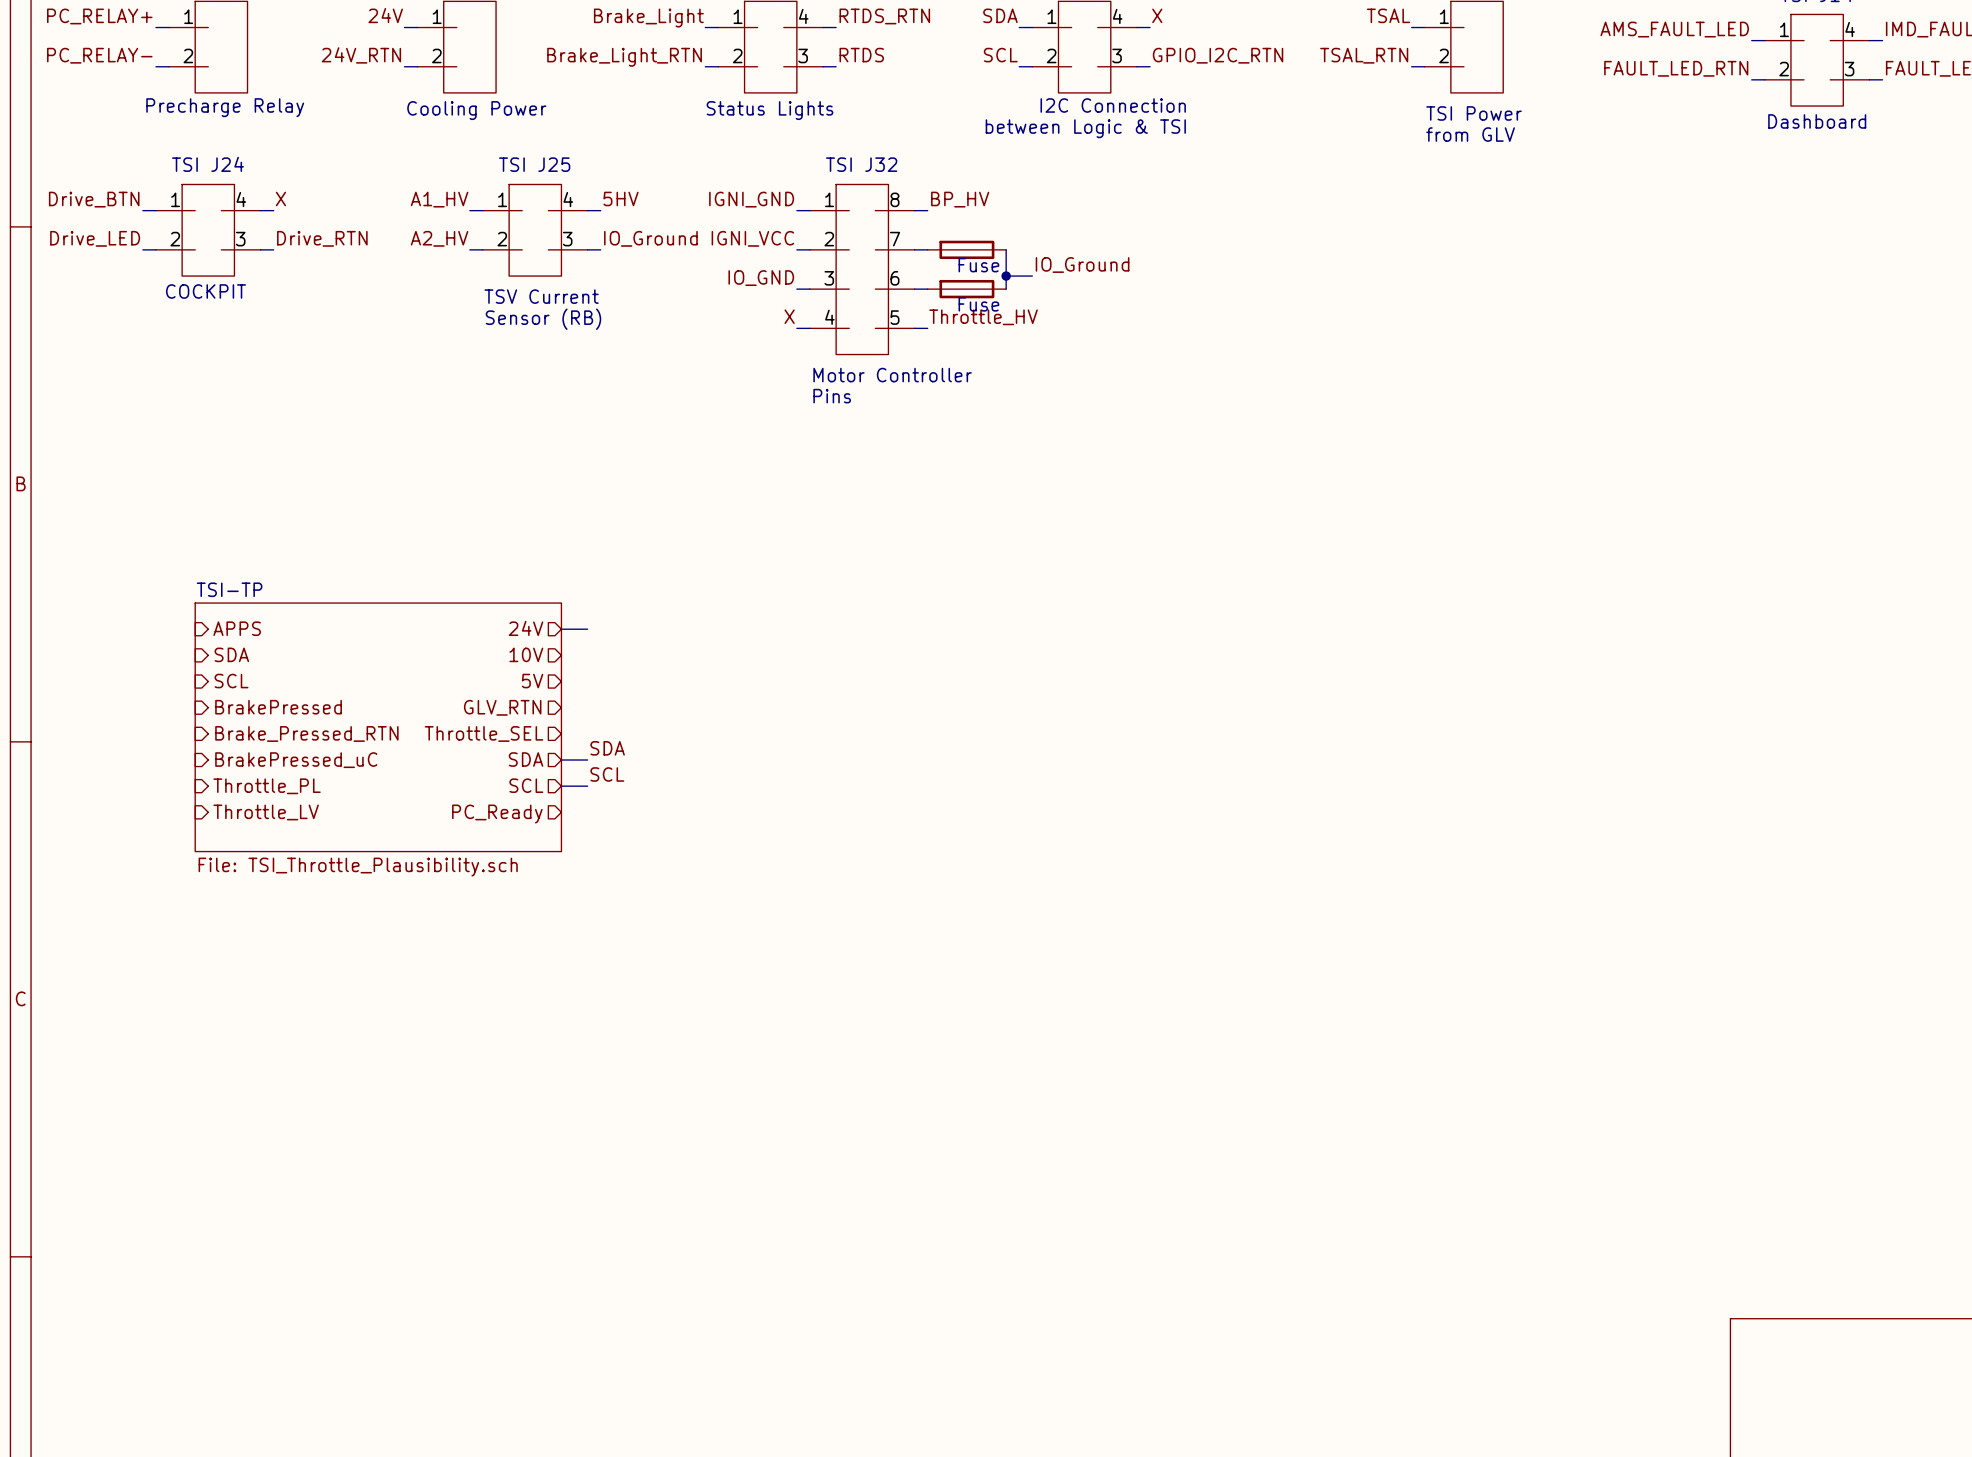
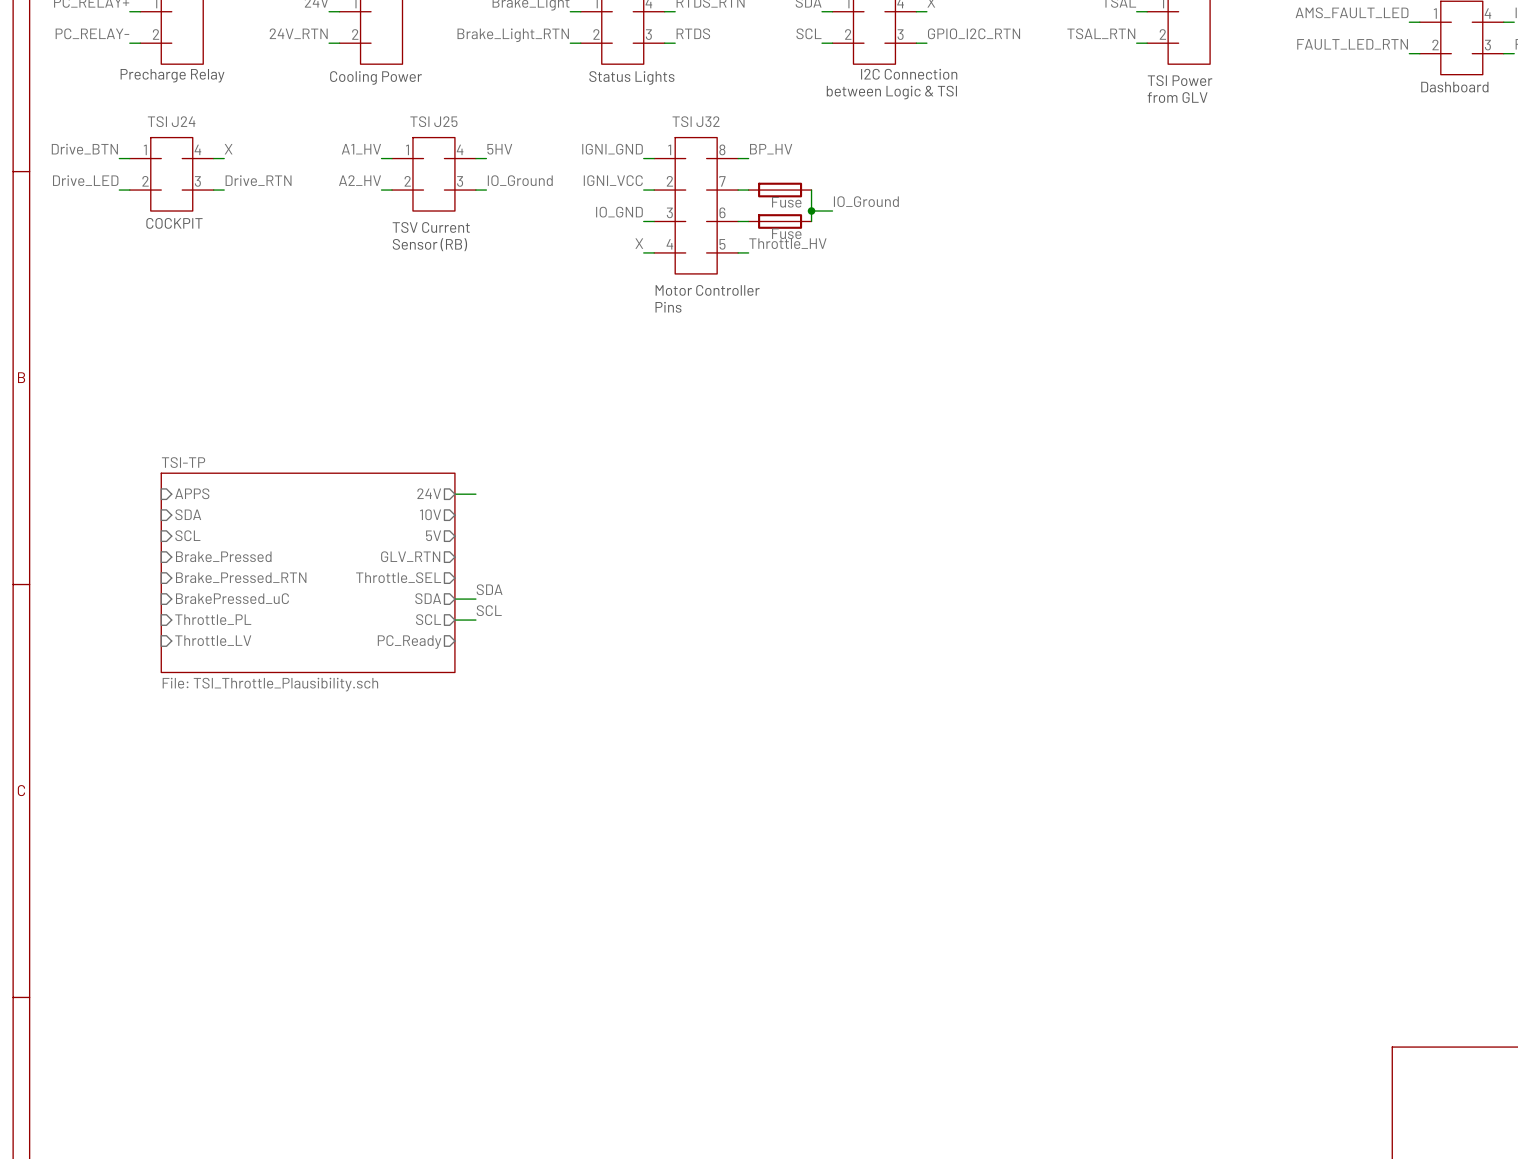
hierarchical label: BrakePressed (278, 707) -> Brake_Pressed (223, 556)

